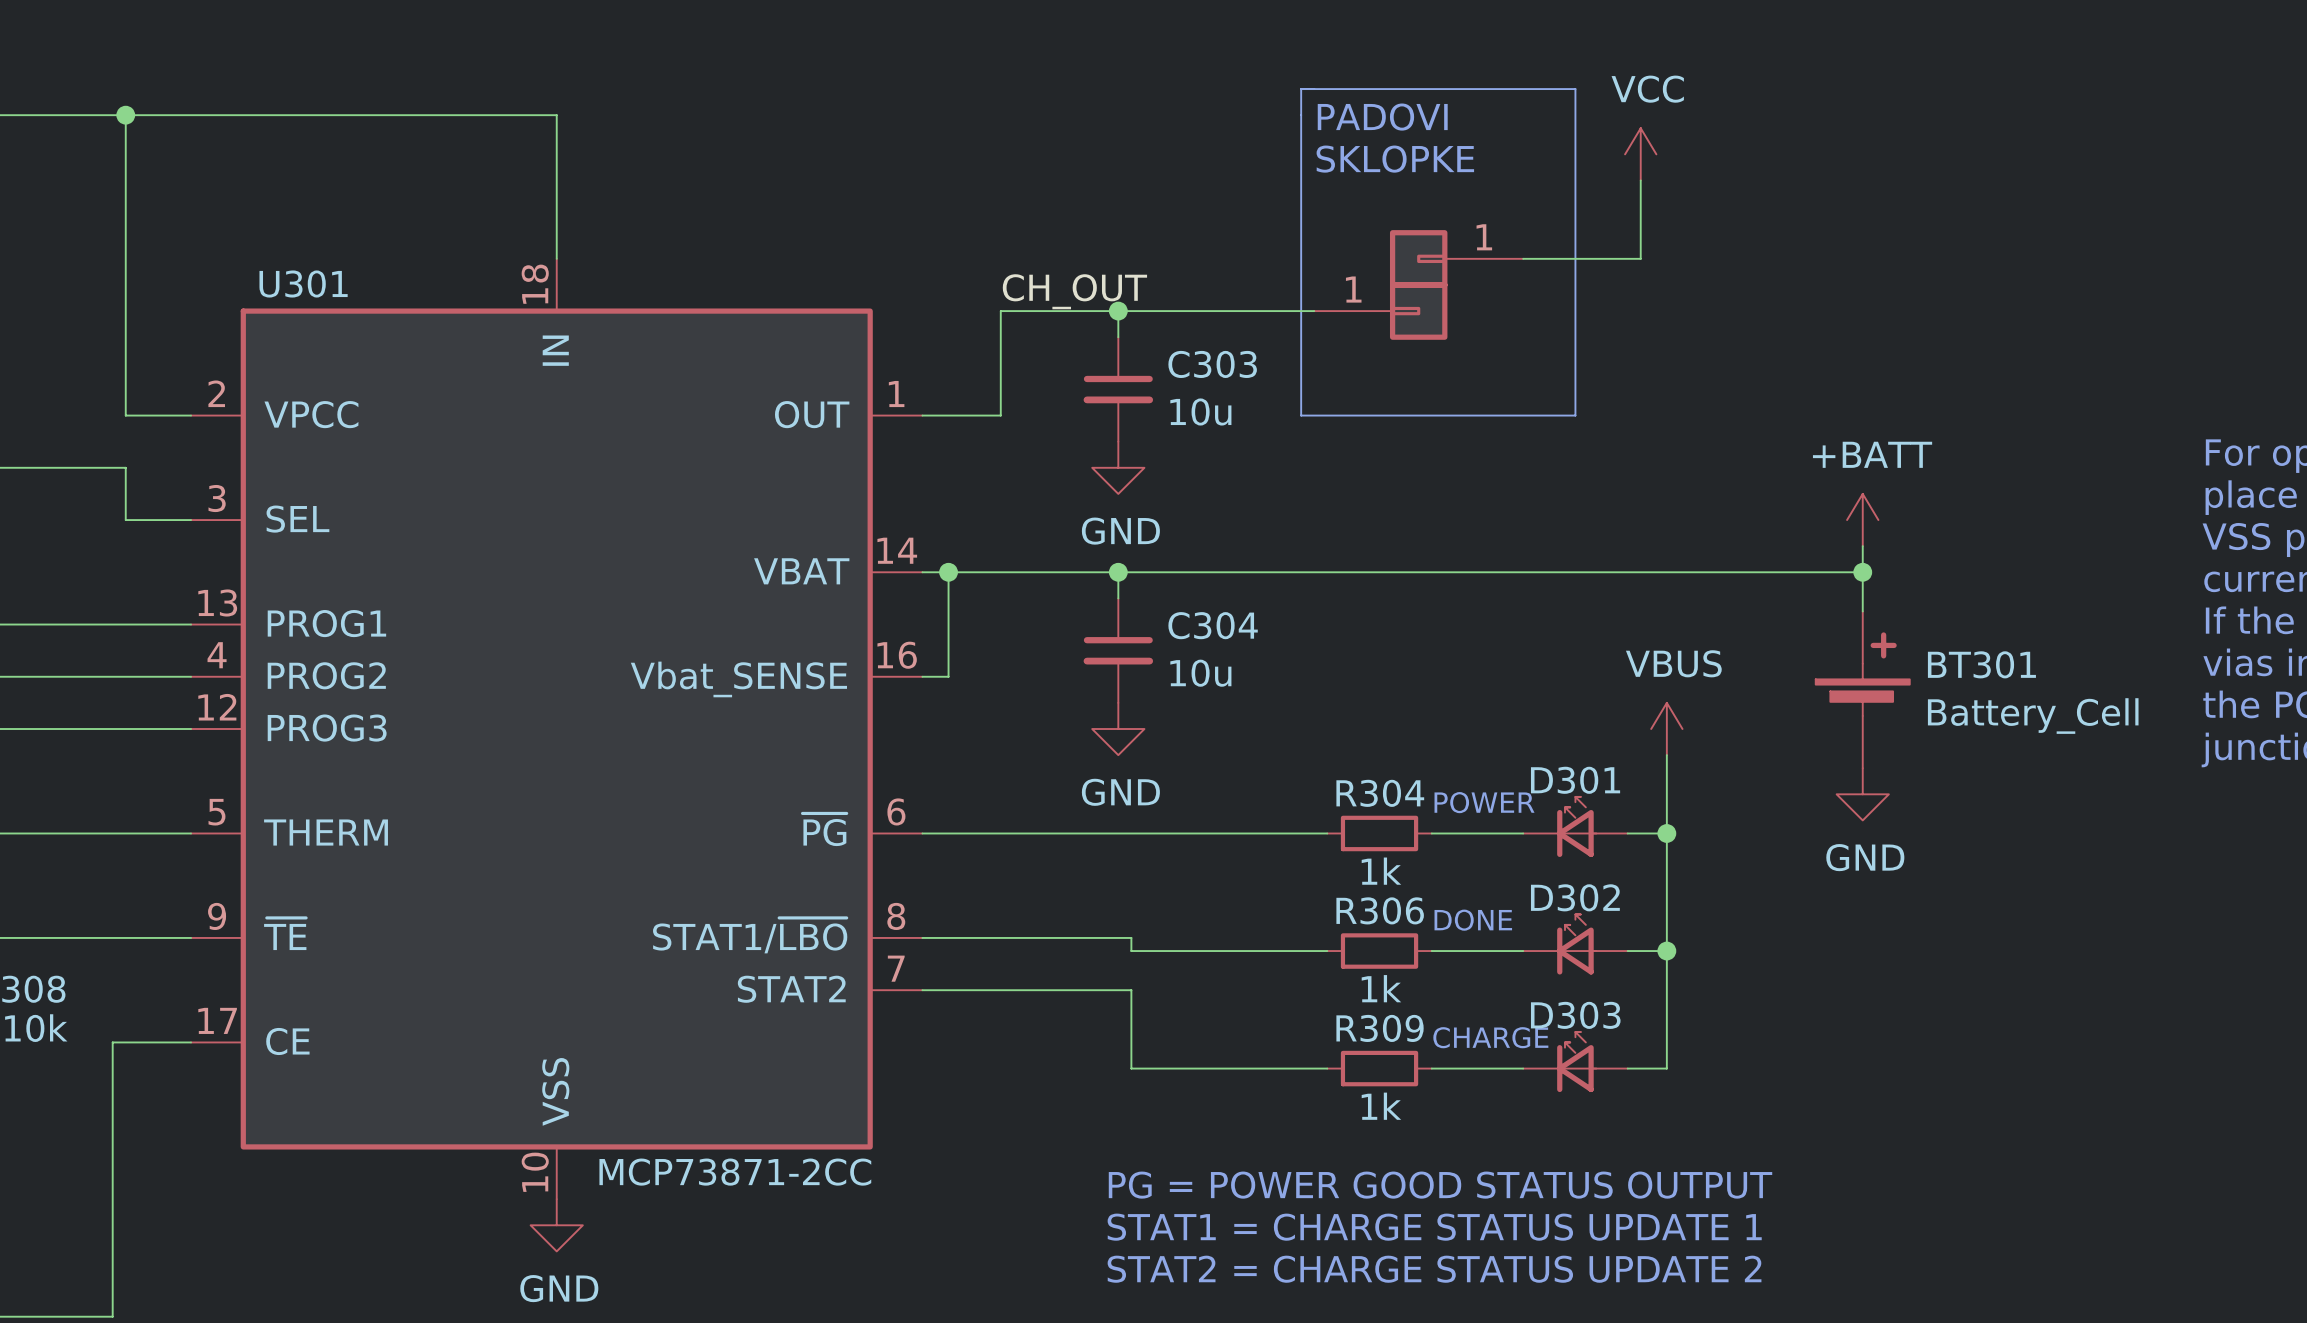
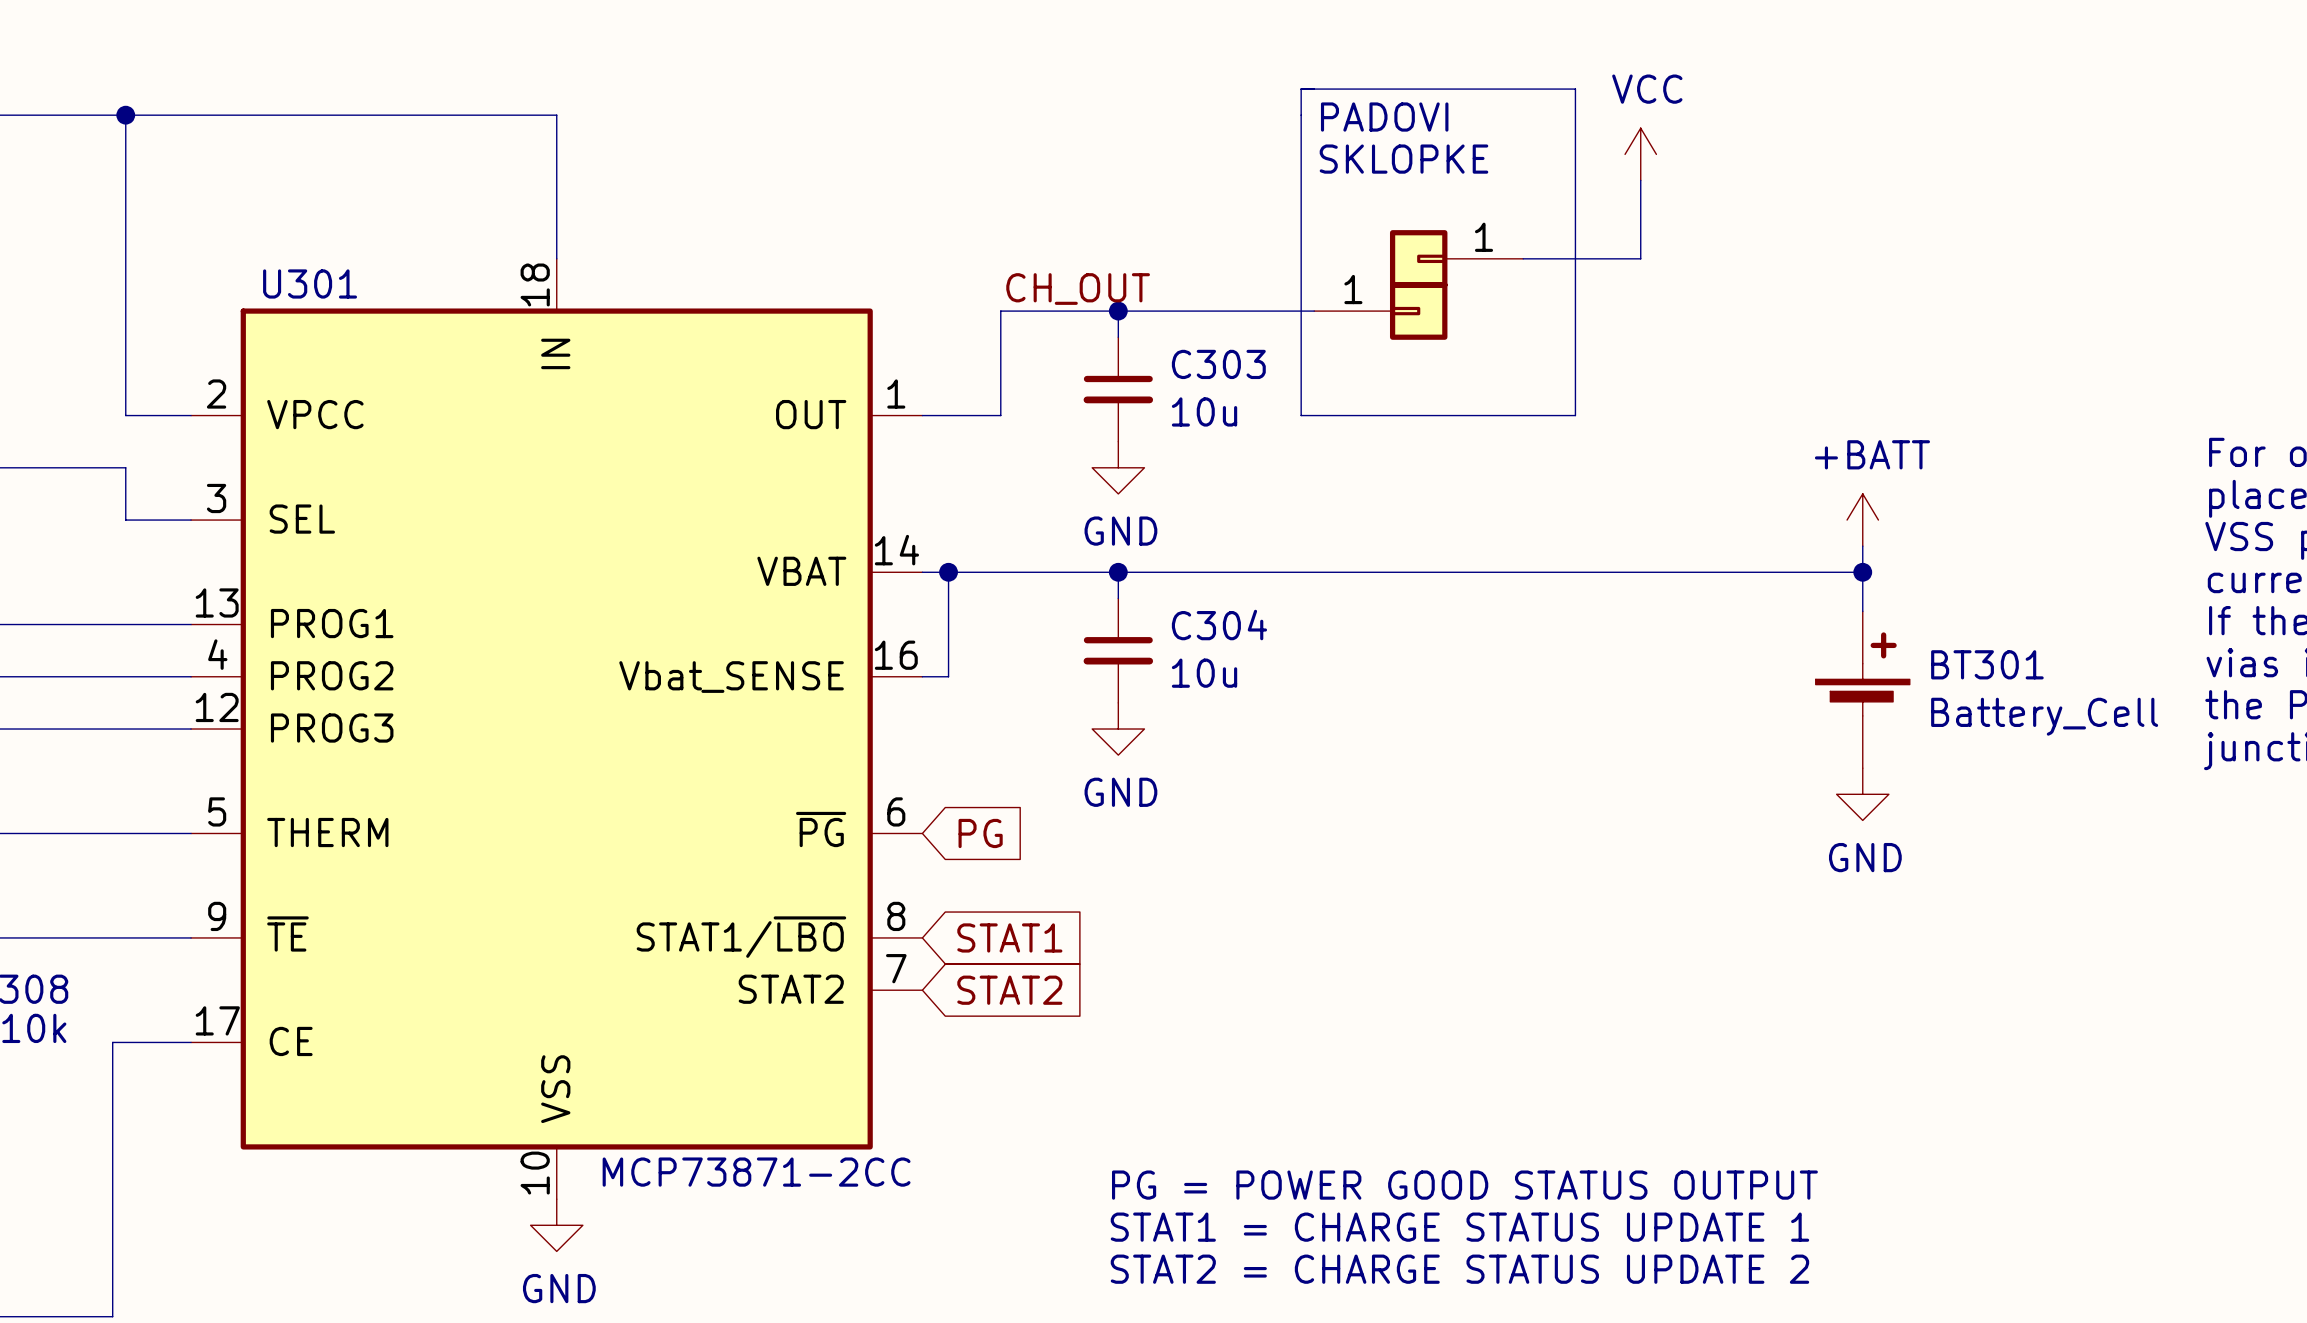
power symbol: VBUS (1666, 729) -> none
wire: (1666, 755) (1666, 1068) (1627, 1068) -> none
text: POWER (1484, 802) -> none
D301: (1575, 826) -> none
wire: (922, 833) (1327, 833) -> none
global label: none -> PG (980, 833)
R304: 1k (1379, 833) -> none
wire: (1431, 833) (1523, 833) -> none
wire: (1627, 833) (1666, 833) -> none
junction: (1666, 833) -> none
text: DONE (1473, 920) -> none
wire: (922, 937) (1131, 937) (1131, 951) (1327, 951) -> none
global label: none -> STAT1 (1009, 937)
D302: (1575, 944) -> none
R306: 1k (1379, 951) -> none
wire: (1431, 951) (1523, 951) -> none
wire: (1627, 951) (1666, 951) -> none
junction: (1666, 951) -> none
wire: (922, 990) (1131, 990) (1131, 1068) (1327, 1068) -> none
global label: none -> STAT2 (1009, 990)
text: CHARGE (1490, 1037) -> none
D303: (1575, 1062) -> none
R309: 1k (1379, 1068) -> none
wire: (1431, 1068) (1523, 1068) -> none

